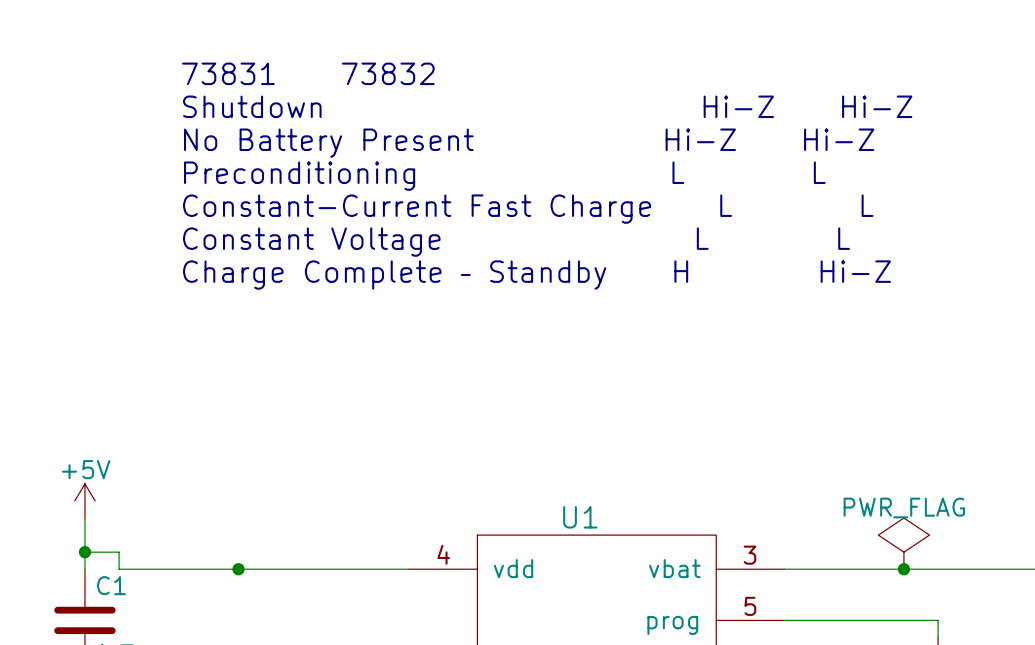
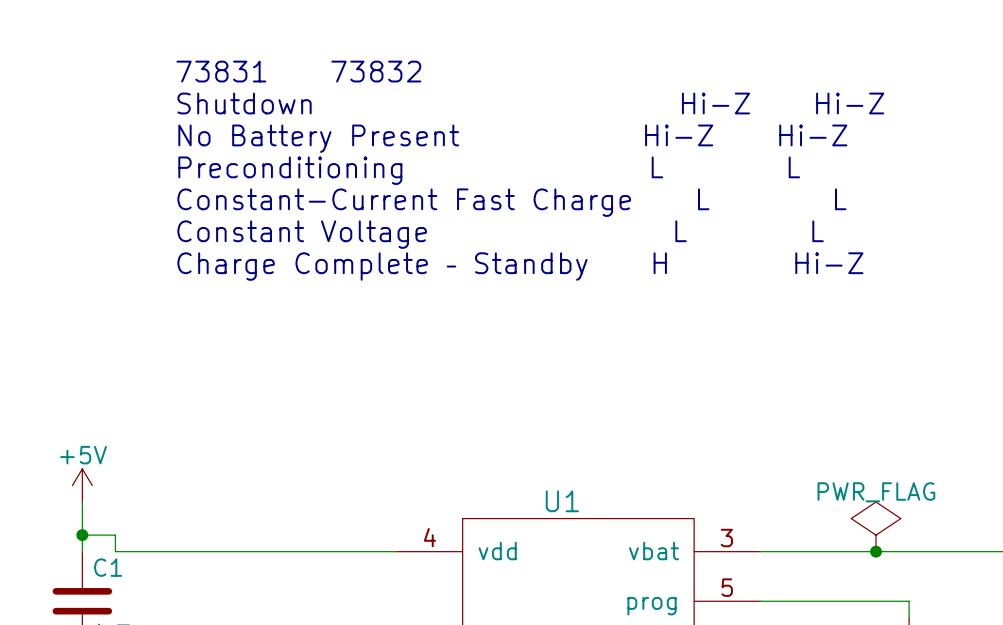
junction: (238, 569) -> none

